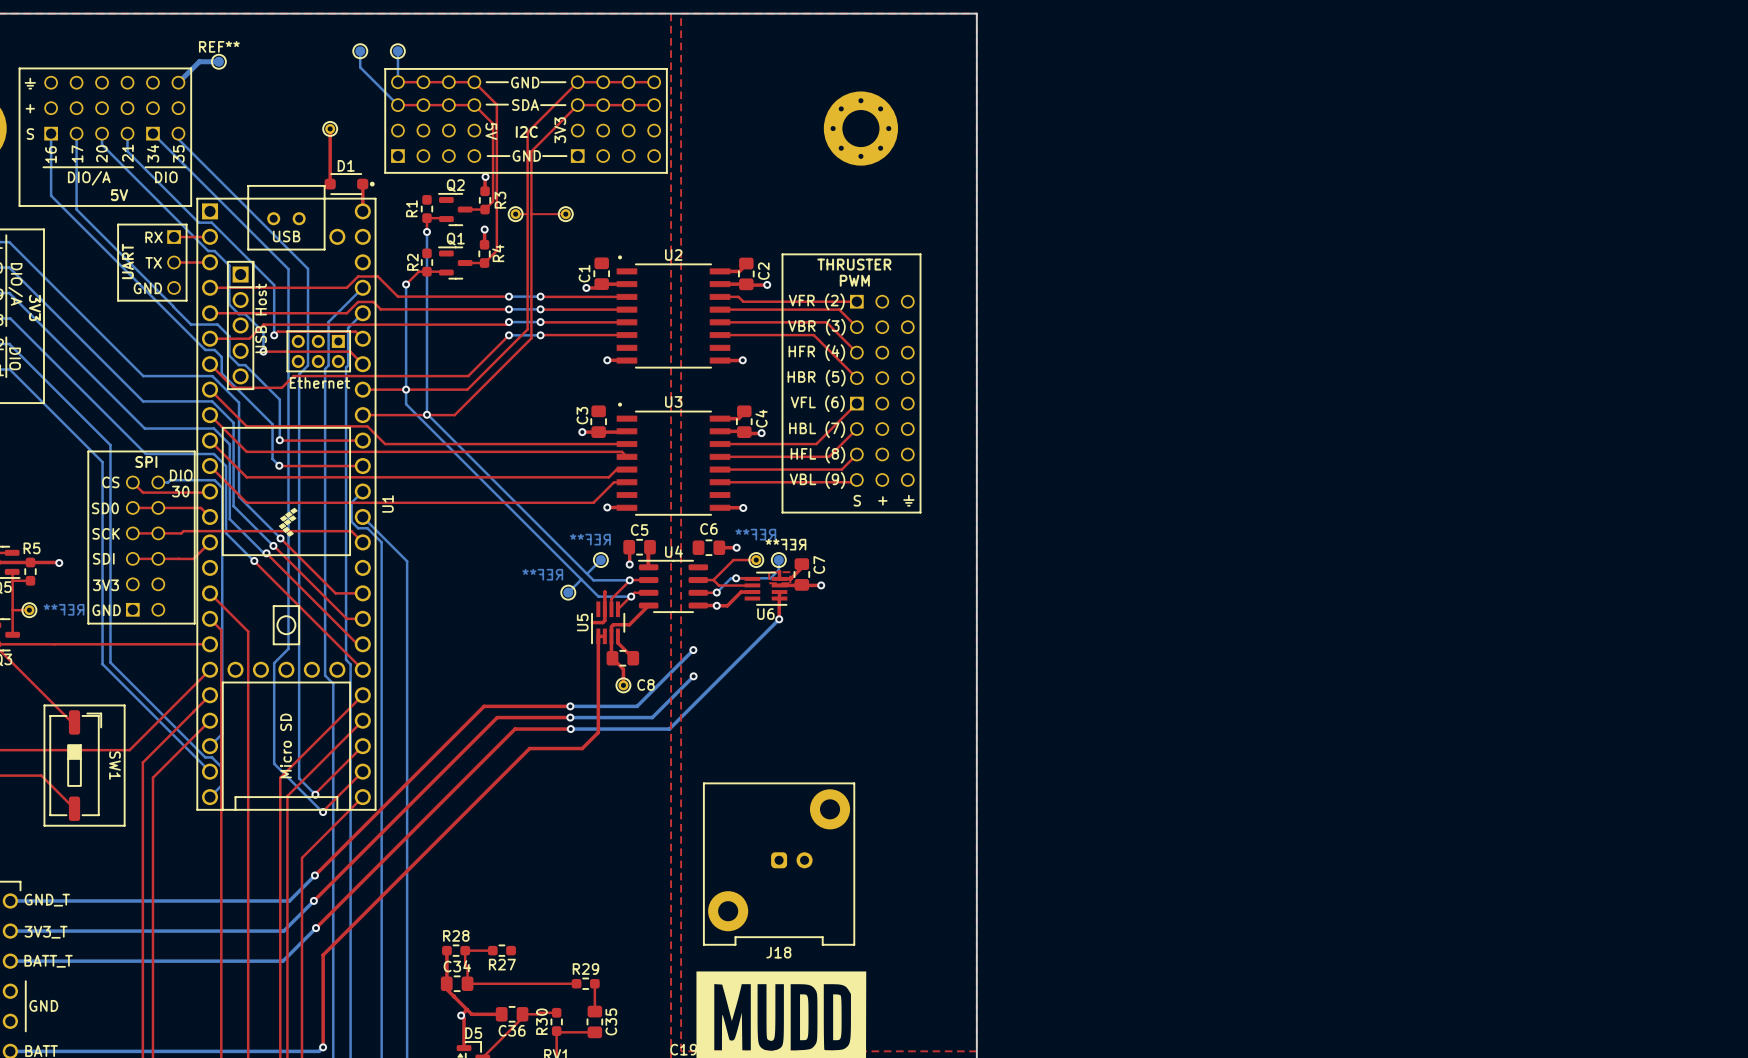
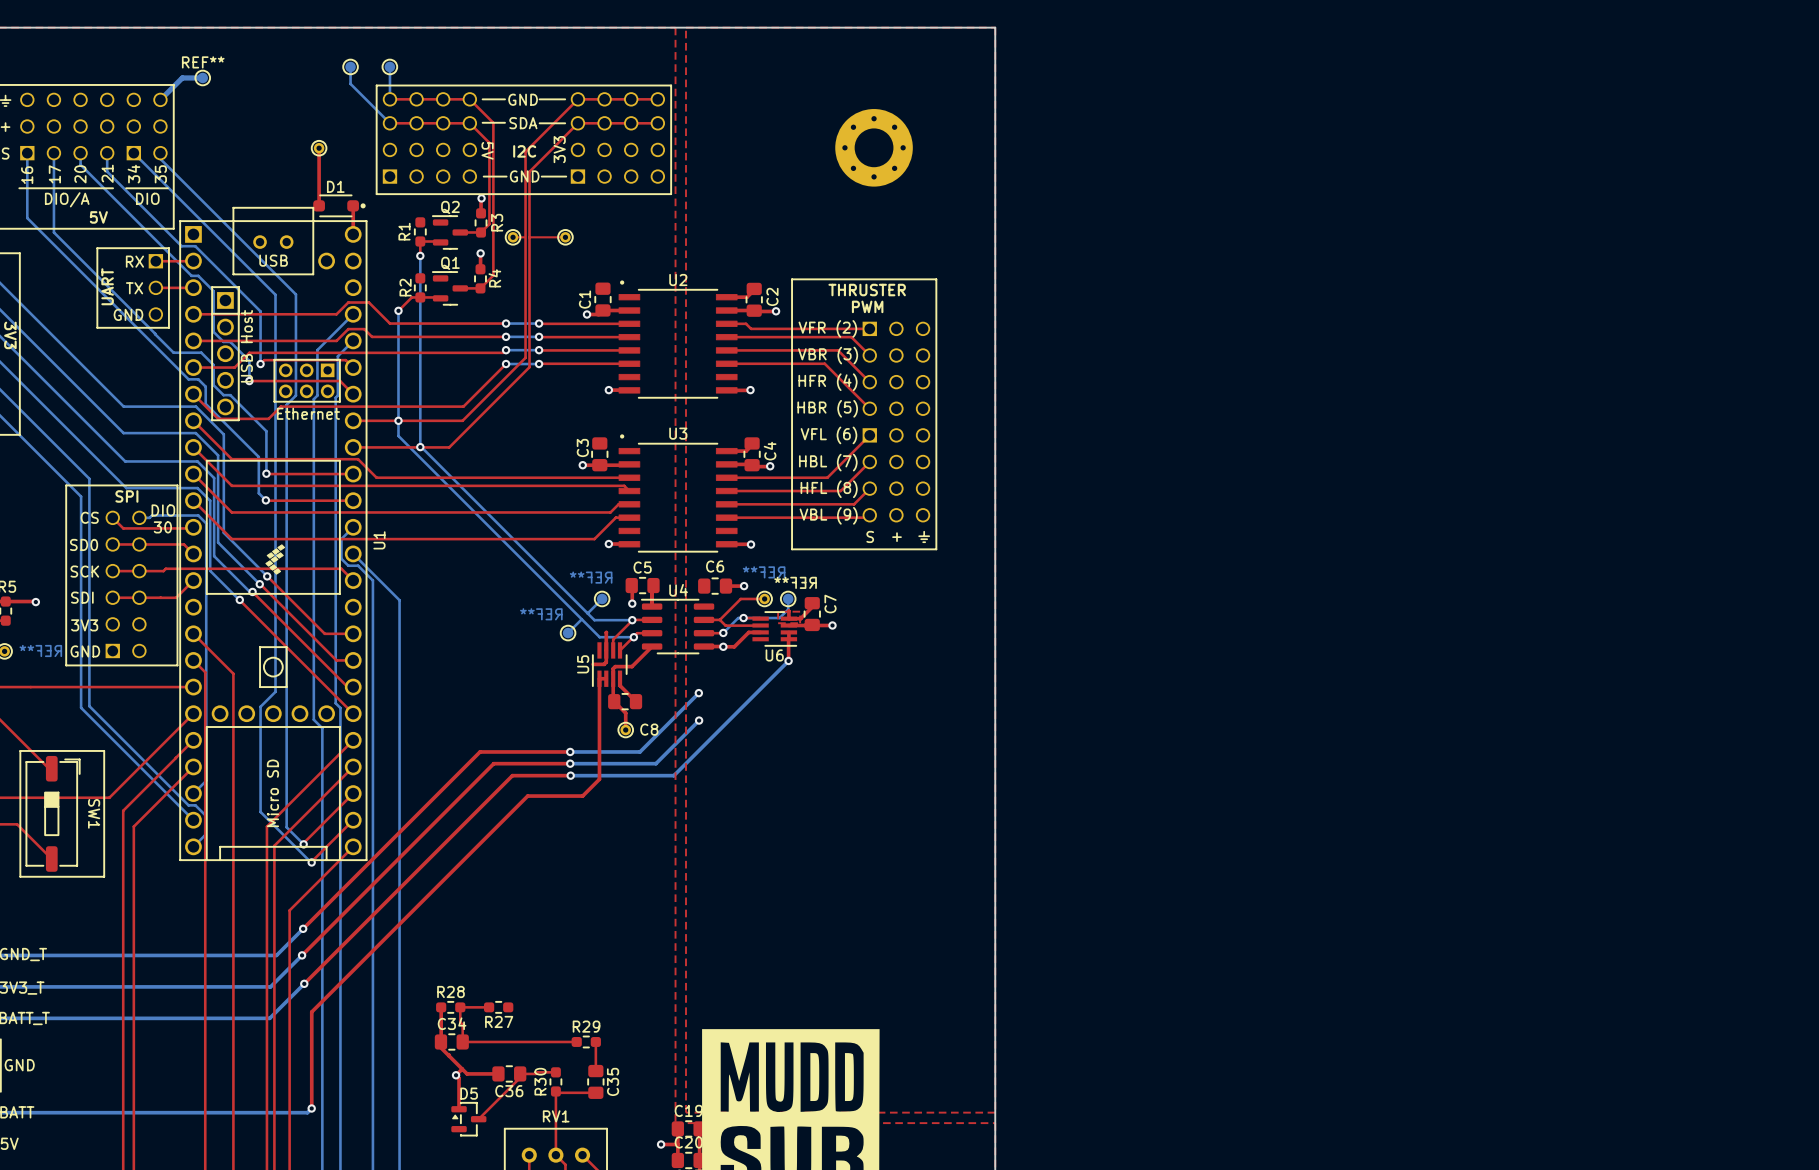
J18: (779, 864) -> none

